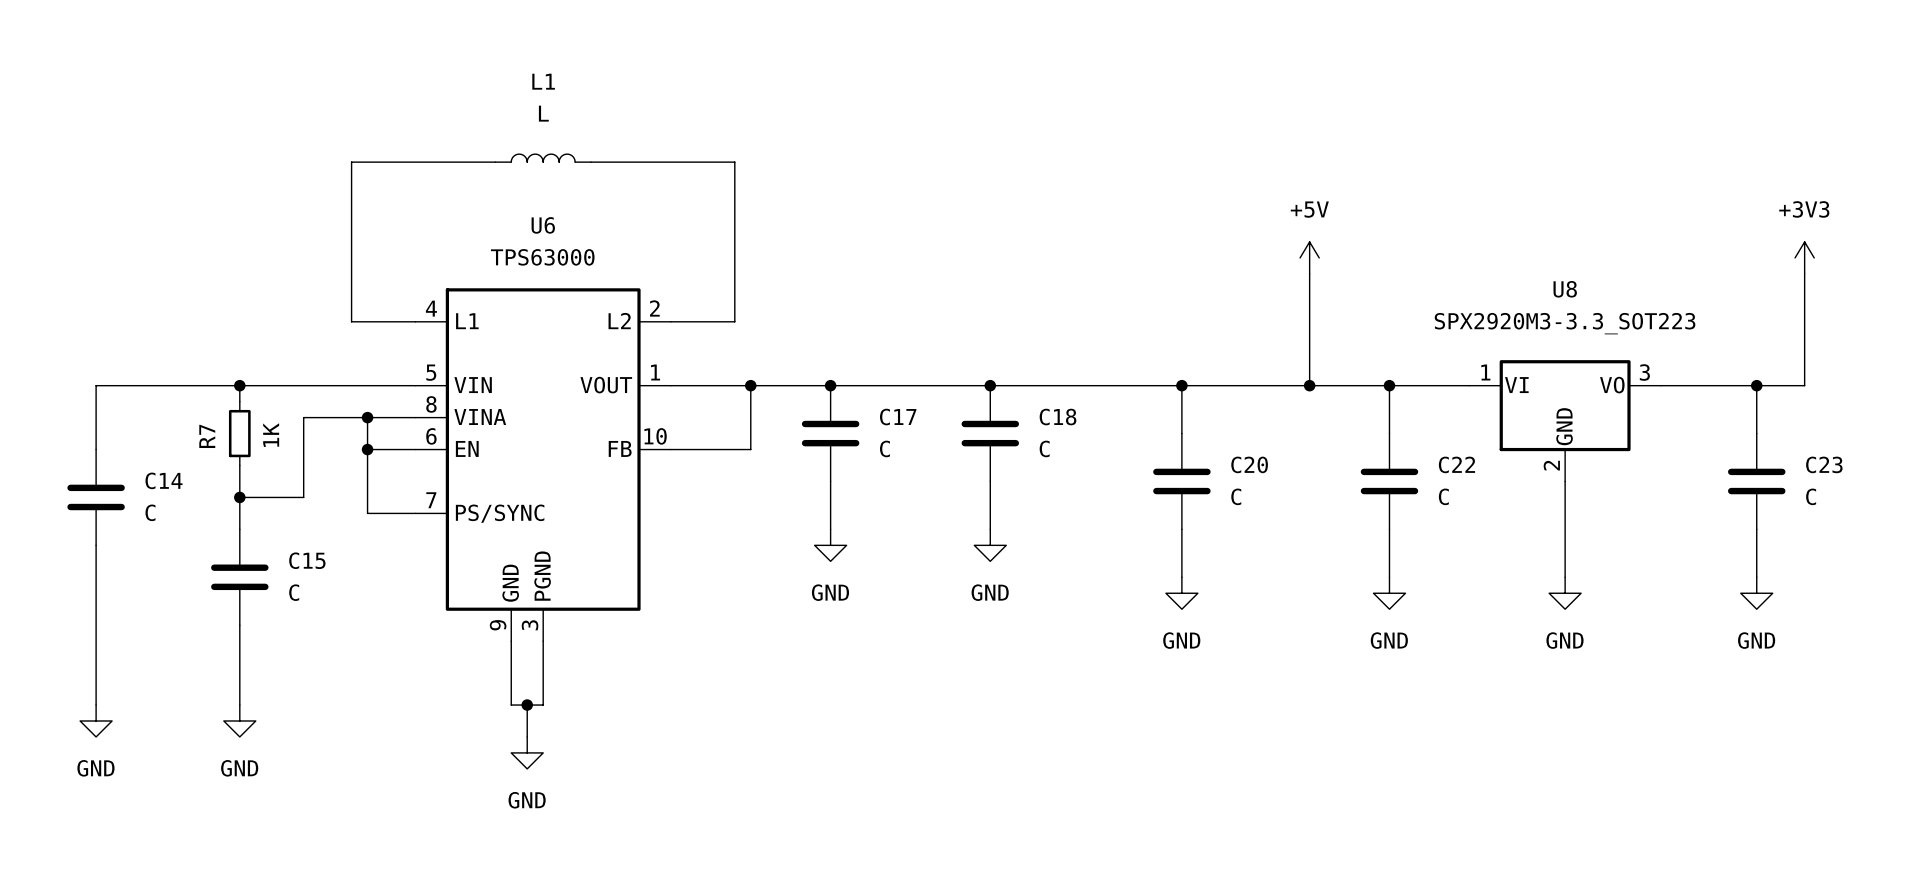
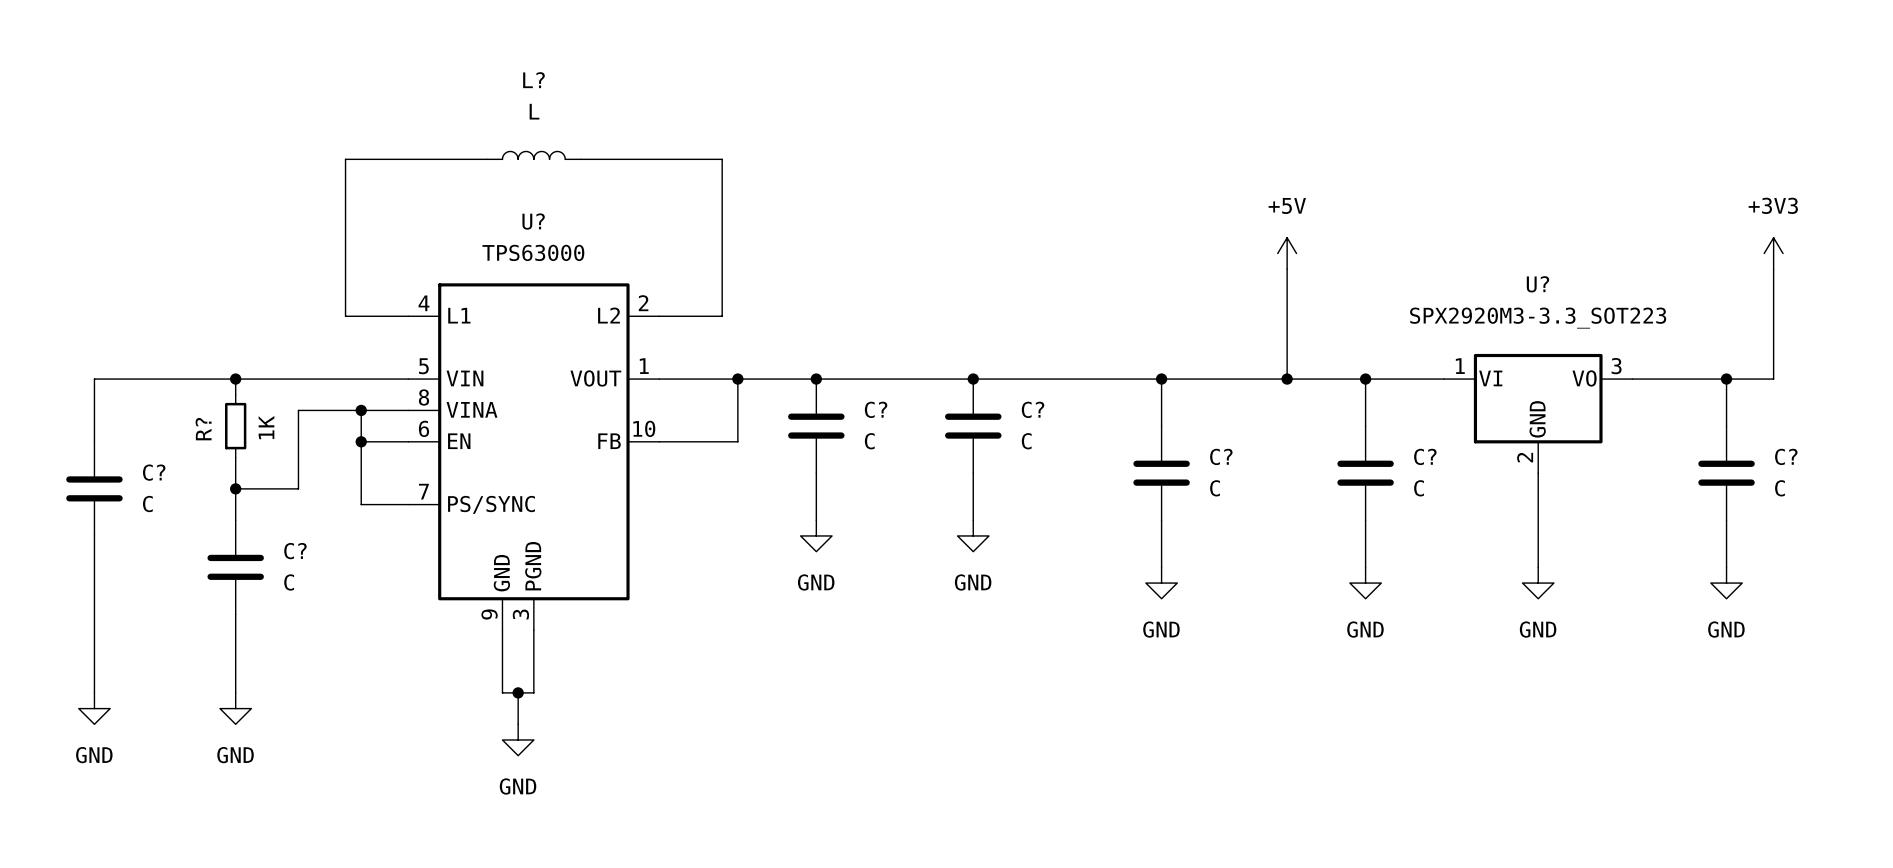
L1 name: L1 (543, 81) -> L? (533, 80)
U6 name: U6 (543, 225) -> U? (533, 221)
U8 name: U8 (1565, 289) -> U? (1537, 284)
C17 name: C17 (898, 417) -> C? (876, 409)
C18 name: C18 (1058, 417) -> C? (1033, 409)
R7 name: R7 (207, 436) -> R? (203, 429)
C20 name: C20 (1249, 464) -> C? (1221, 456)
C22 name: C22 (1456, 464) -> C? (1425, 456)
C23 name: C23 (1824, 464) -> C? (1786, 456)
C14 name: C14 (164, 480) -> C? (154, 472)
C15 name: C15 (307, 560) -> C? (295, 551)

